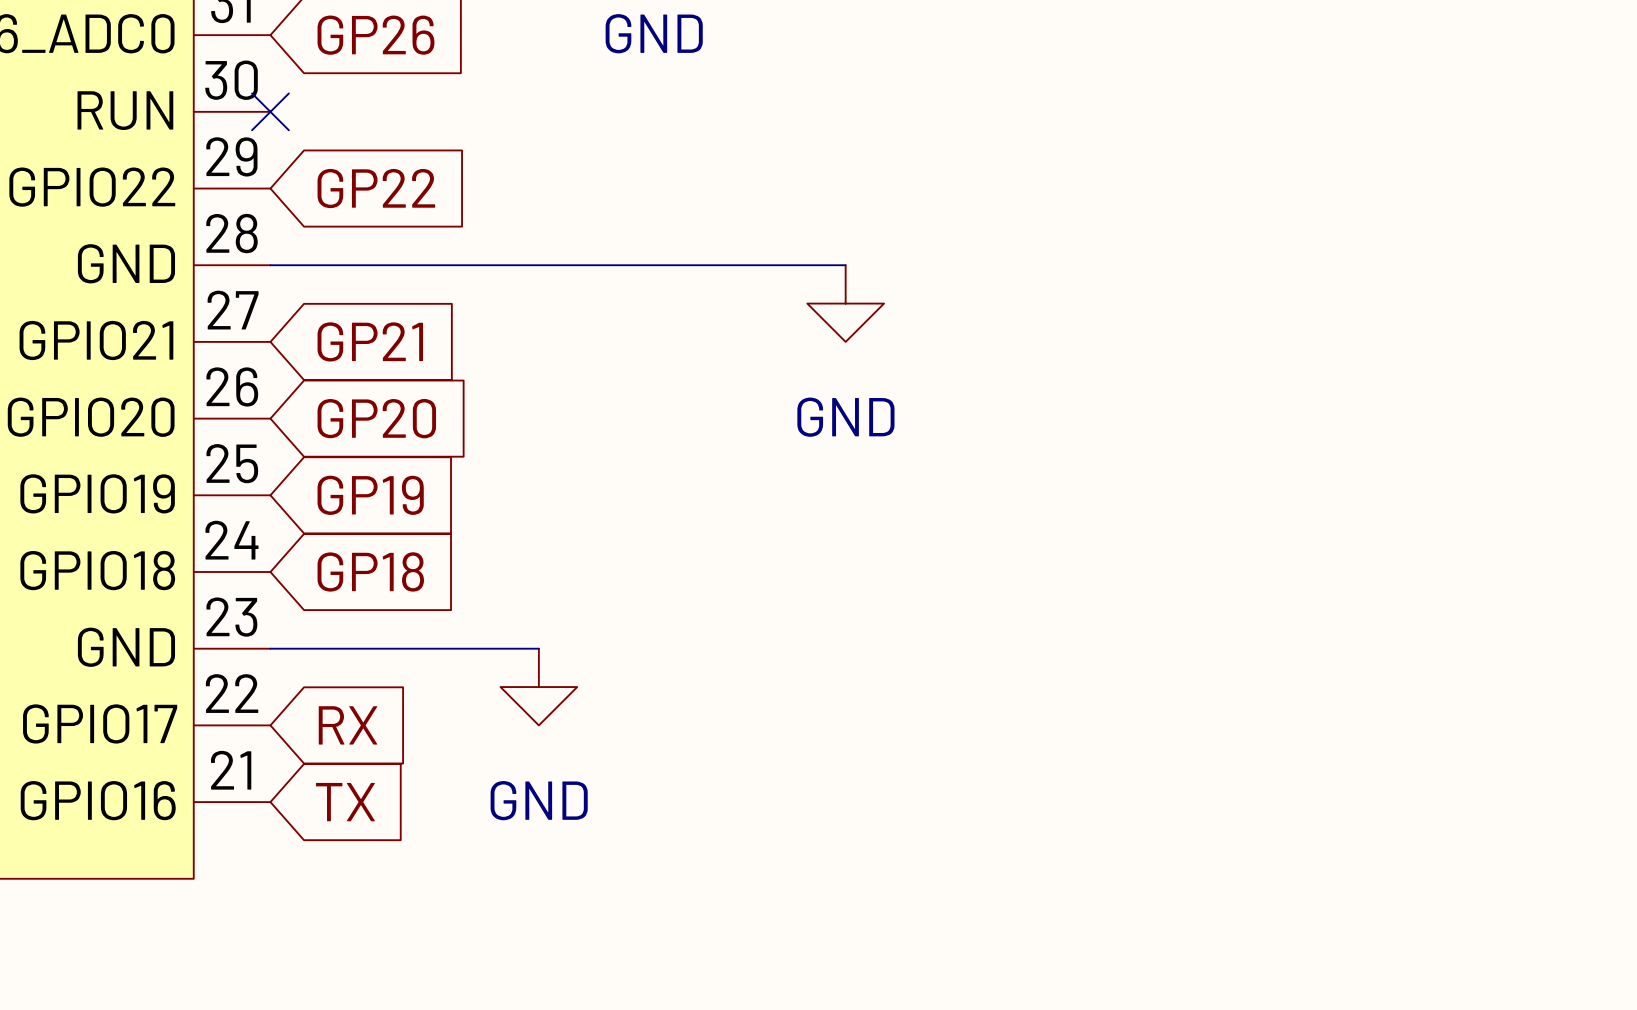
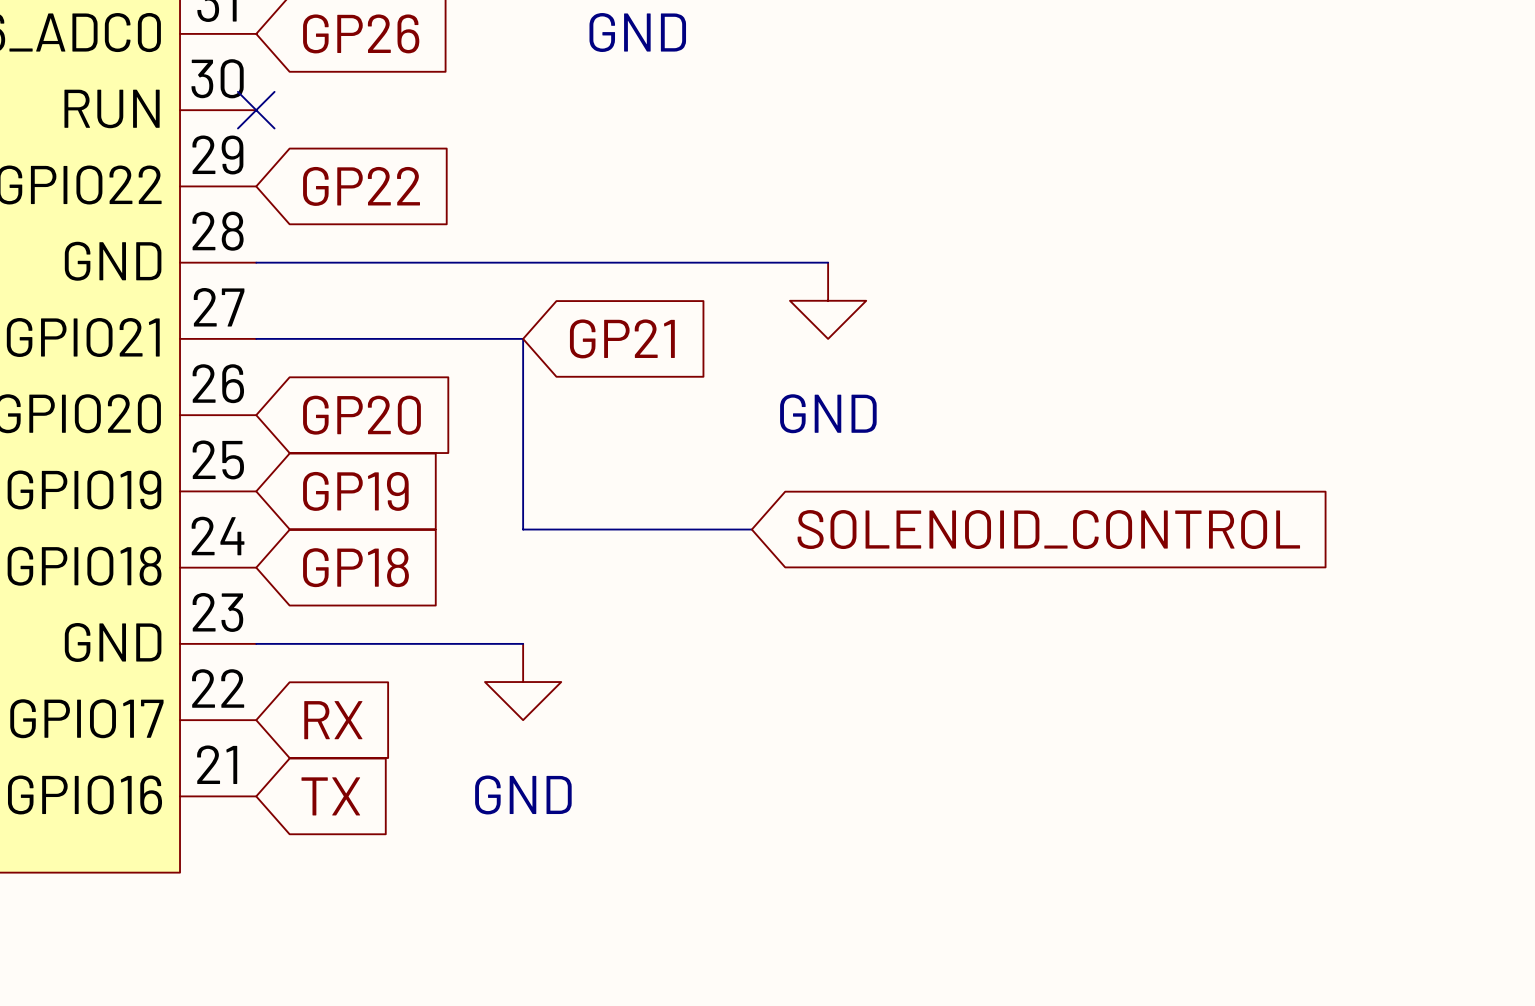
wire: none -> (256, 338) (523, 338) (523, 529) (751, 529)
global label position: GP21 (370, 341) -> GP21 (622, 338)
global label: none -> SOLENOID_CONTROL (1048, 529)

